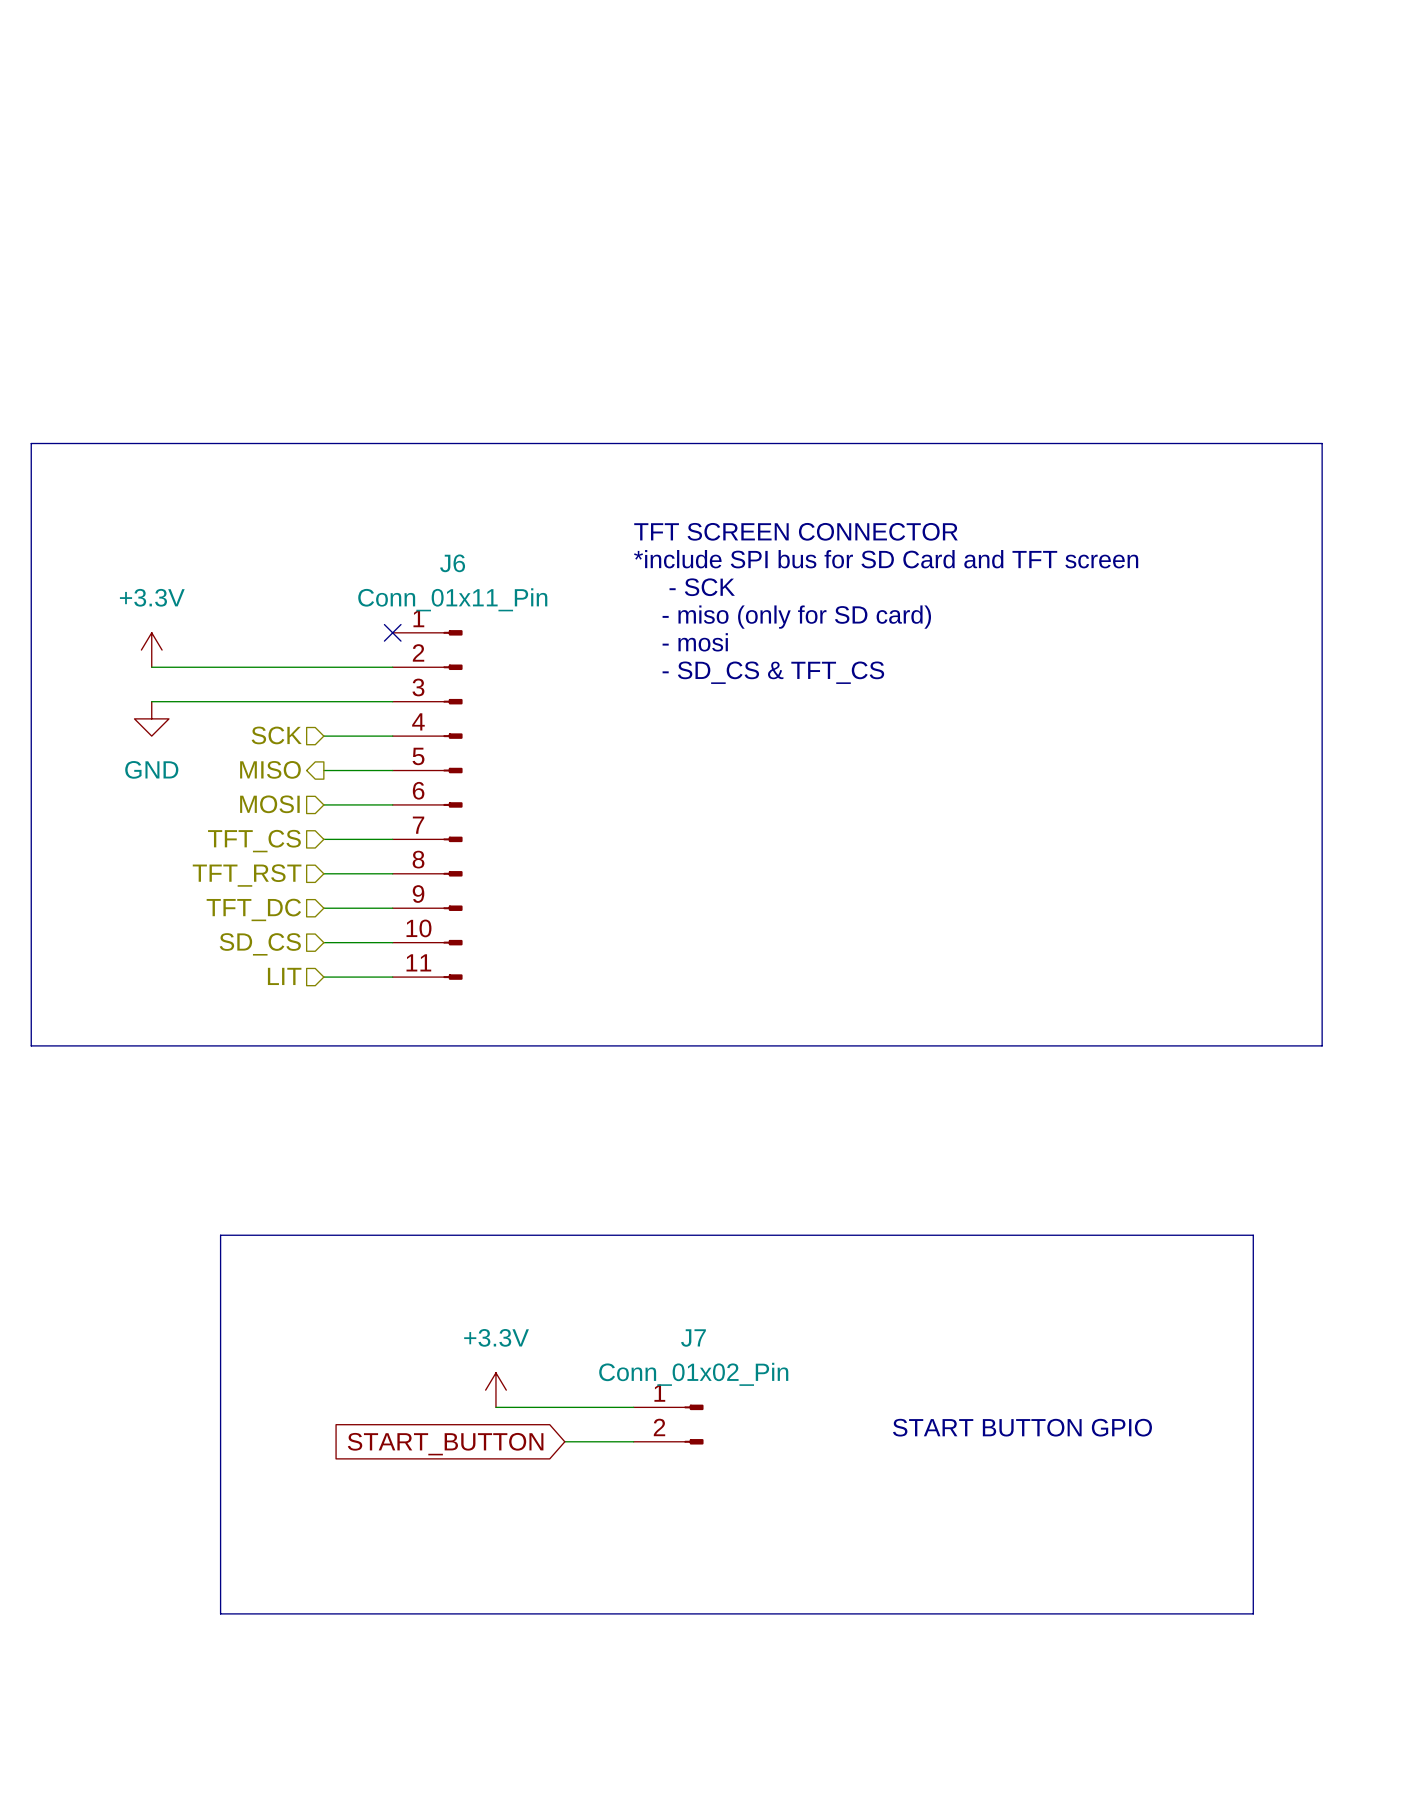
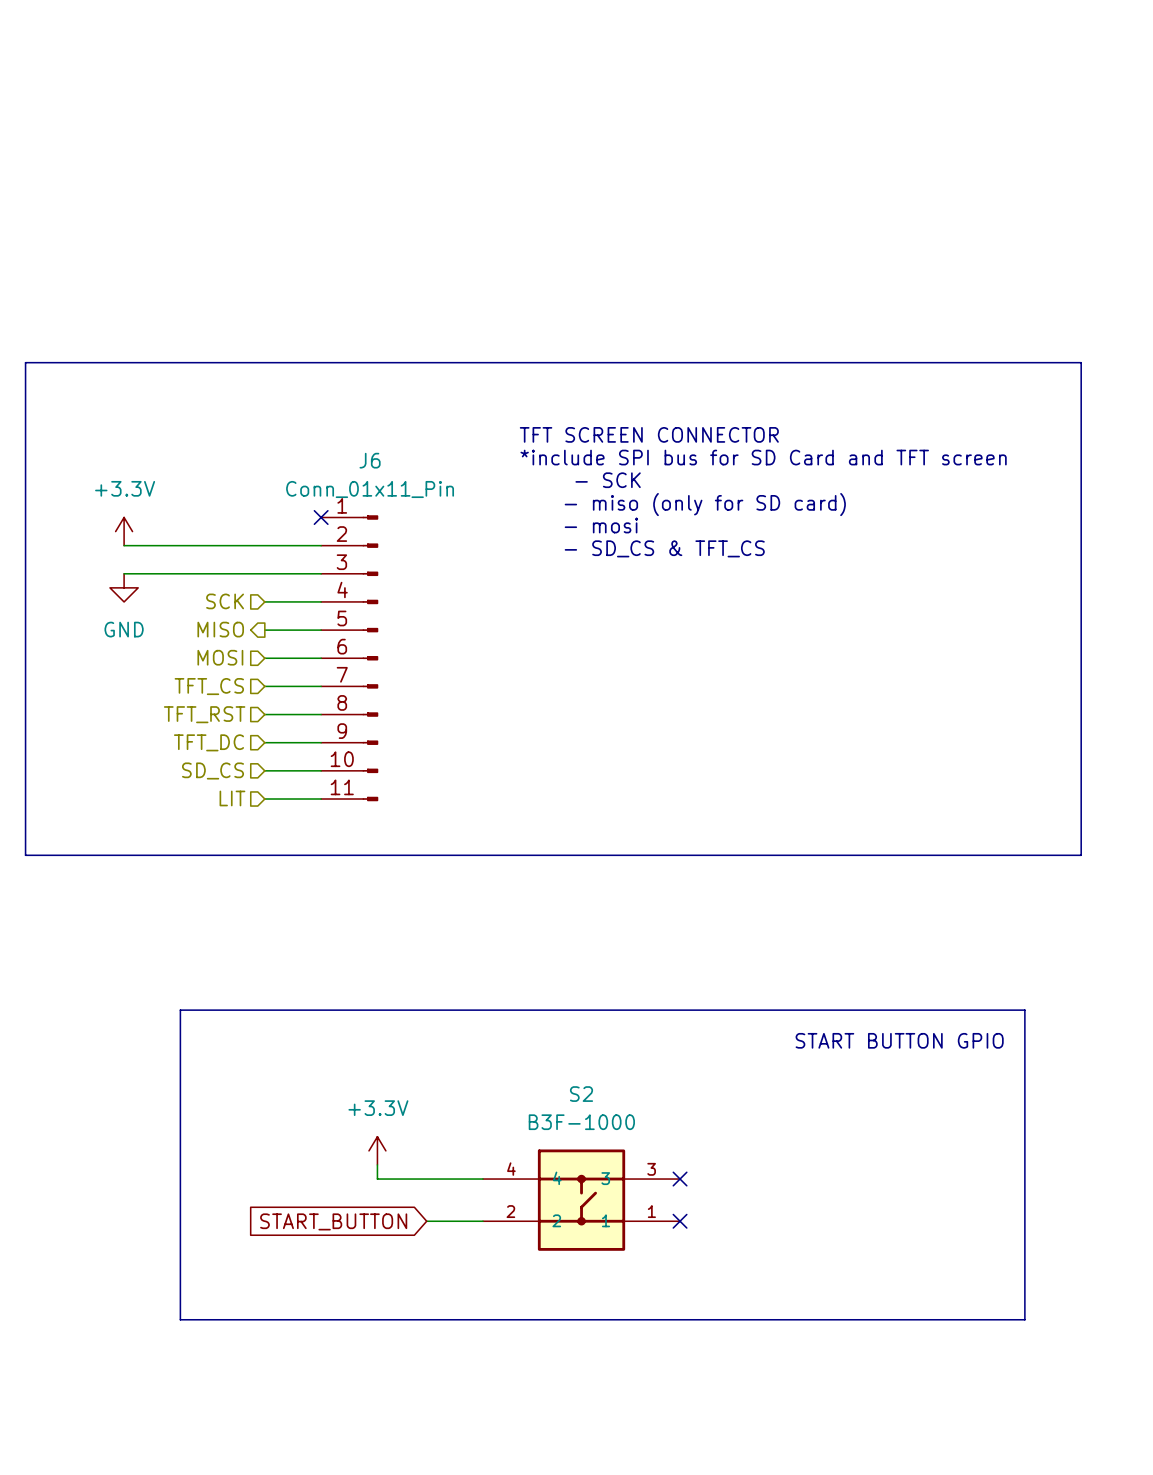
power symbol position: +3.3V (495, 1390) -> +3.3V (377, 1150)
wire: (495, 1407) (633, 1407) -> none
wire: none -> (377, 1164) (377, 1179) (461, 1179)
J7: Conn_01x02_Pin (668, 1424) -> none
text position: START BUTTON GPIO (1022, 1427) -> START BUTTON GPIO (899, 1040)
no-connect mark: none -> (680, 1179)
global label position: START_BUTTON (445, 1444) -> START_BUTTON (333, 1221)
S2: none -> B3F-1000 (581, 1200)
wire: none -> (426, 1221) (483, 1221)
no-connect mark: none -> (680, 1221)

